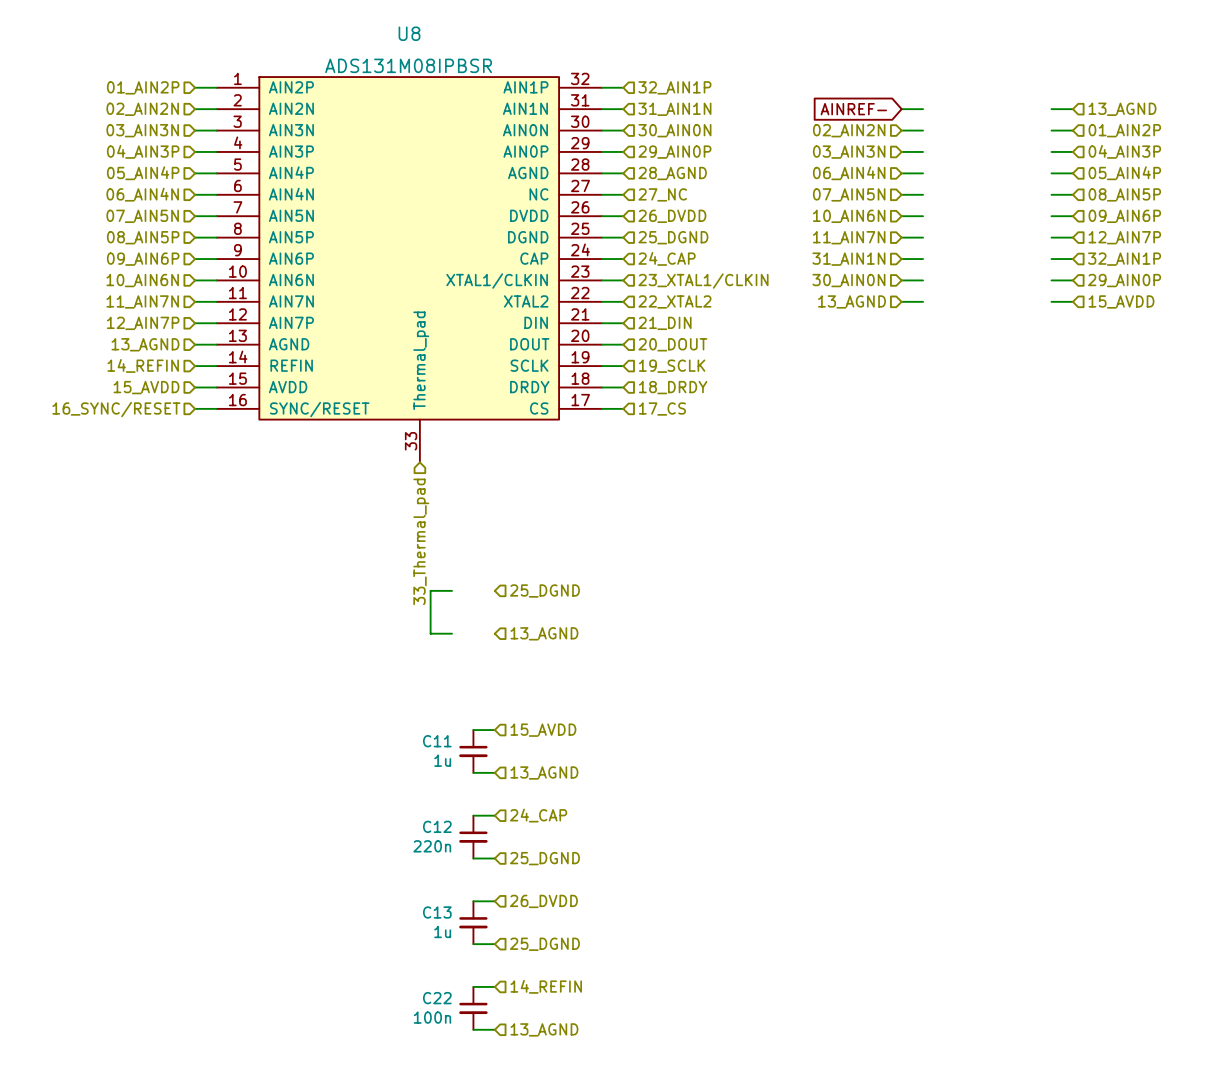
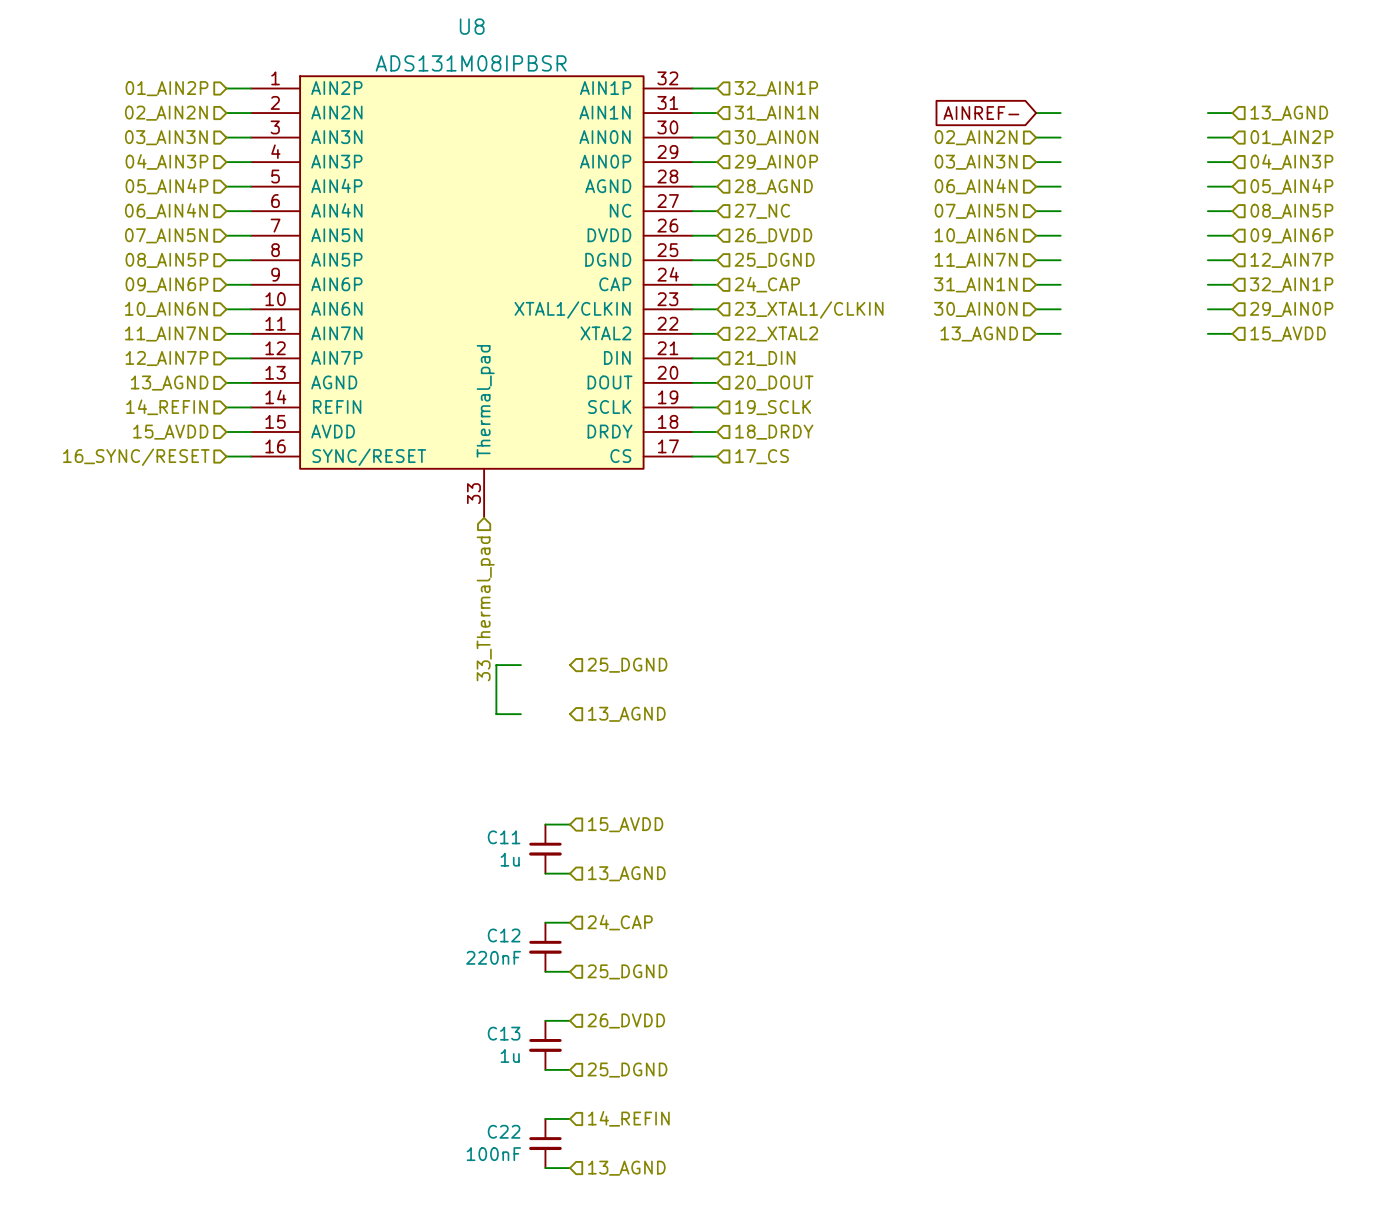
C12 value: 220n (432, 846) -> 220nF (493, 957)
C22 value: 100n (432, 1017) -> 100nF (493, 1154)

